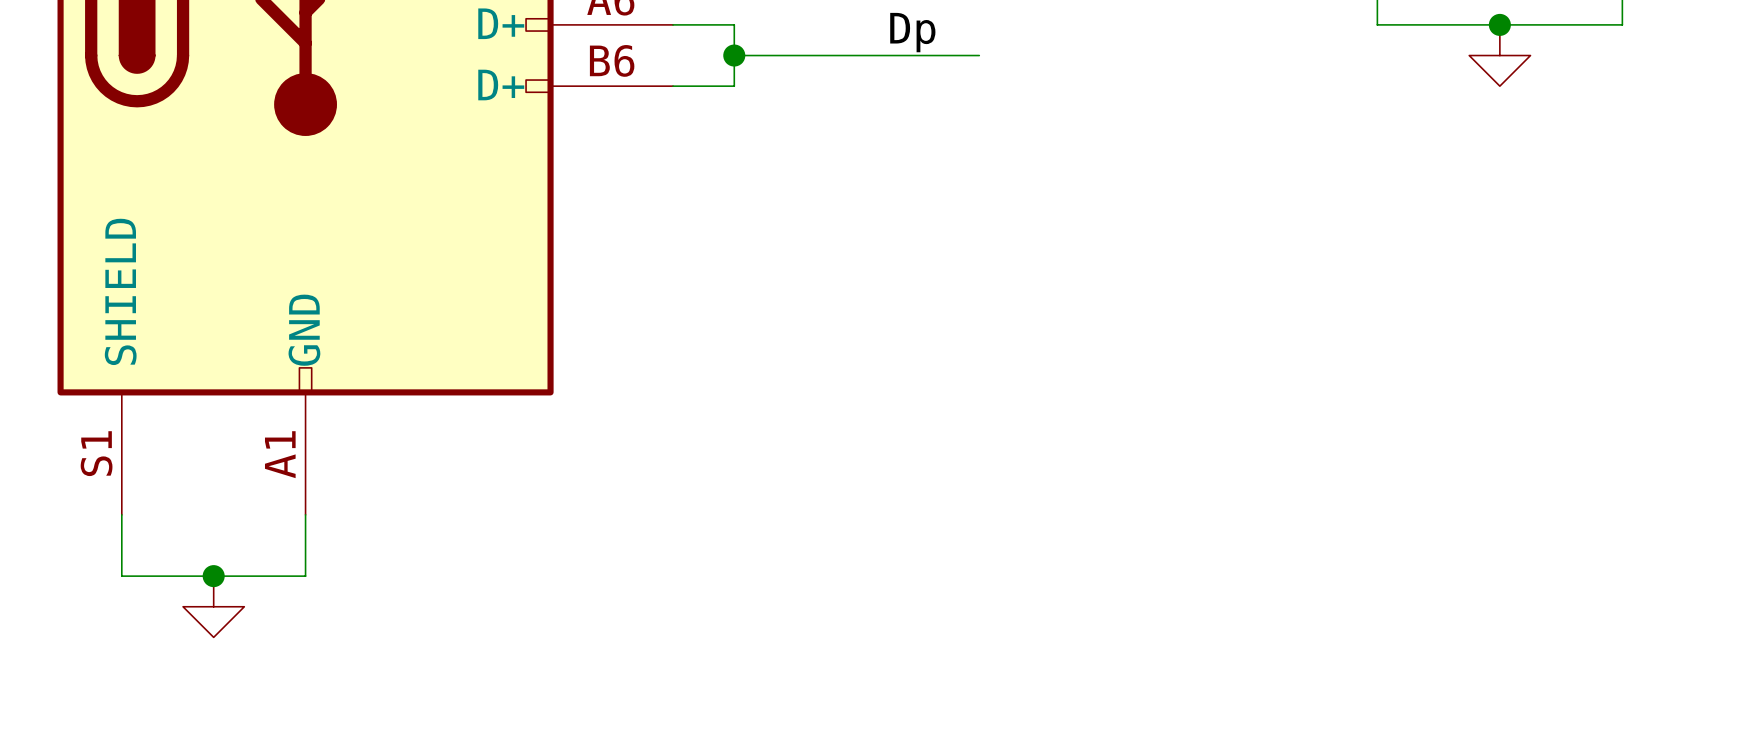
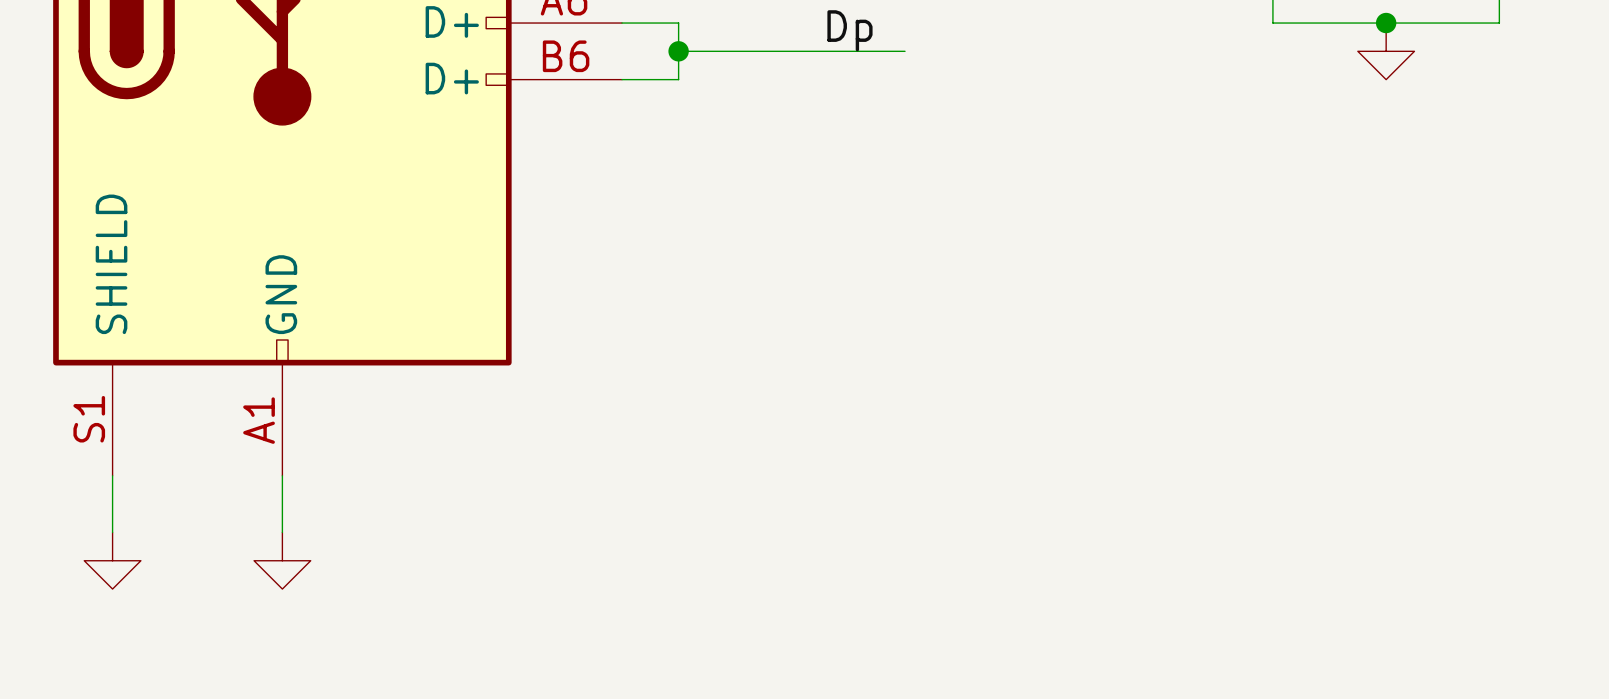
wire: (121, 576) (305, 576) -> none
junction: (213, 576) -> none
power symbol: none -> (112, 560)
power symbol: (213, 606) -> none
power symbol: none -> (282, 560)

